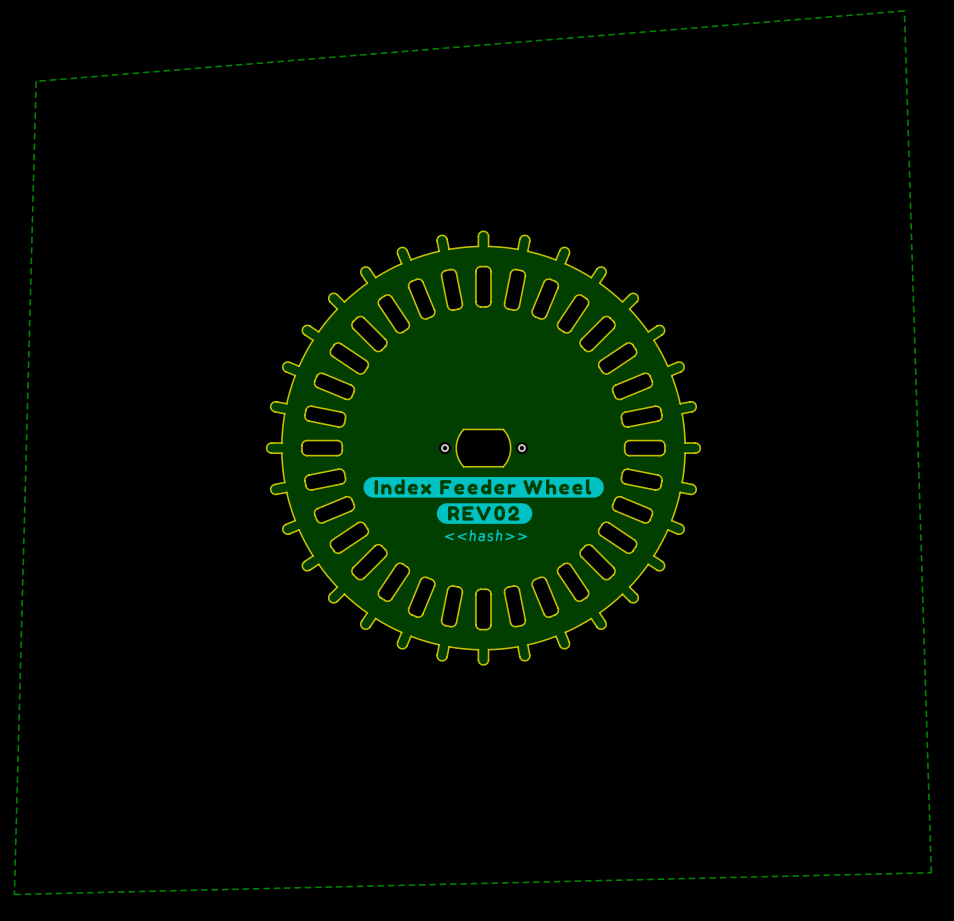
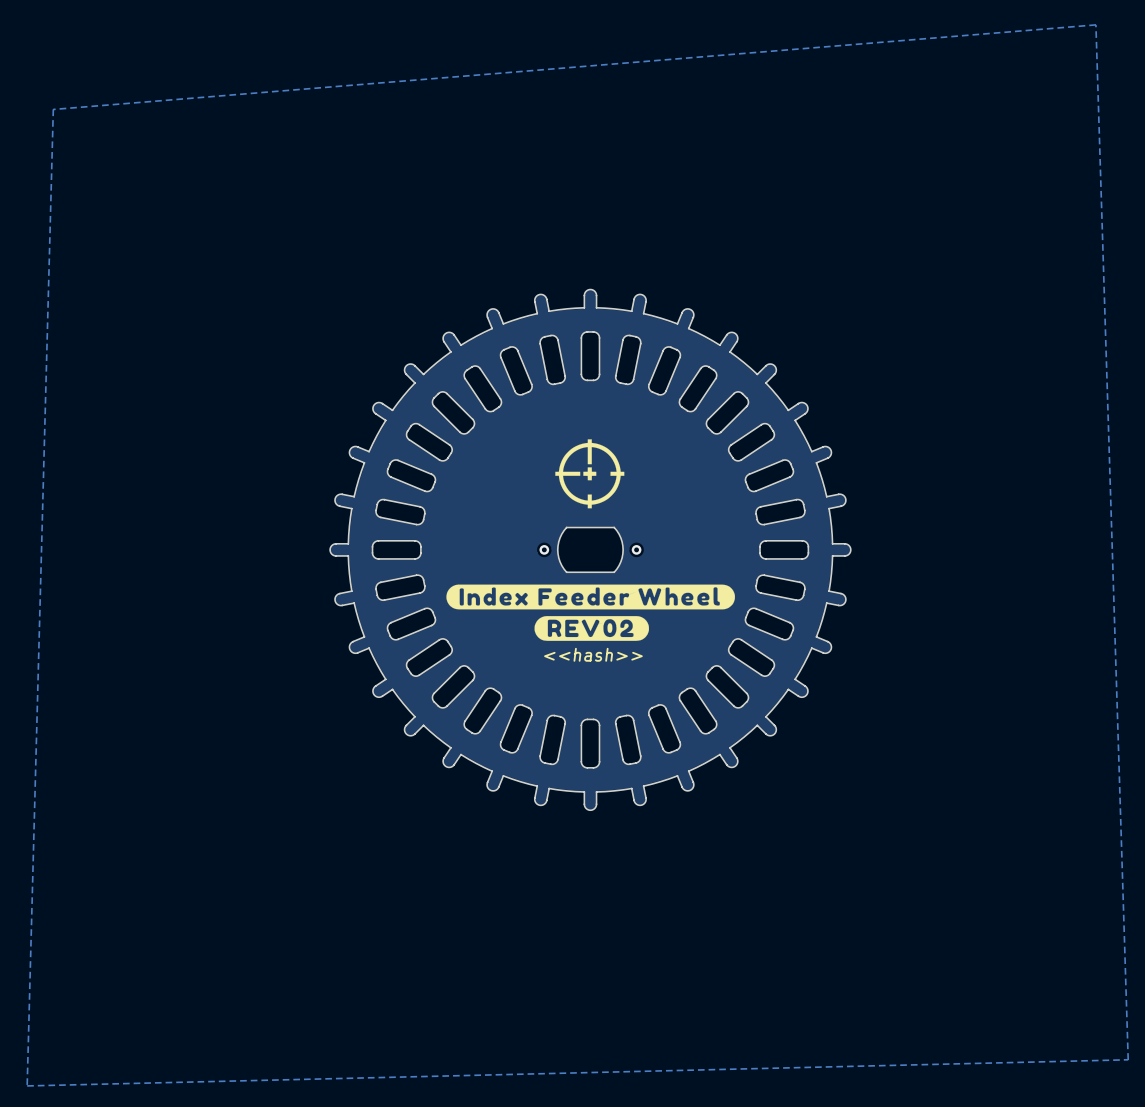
drawing: none -> [555, 439, 625, 509]

